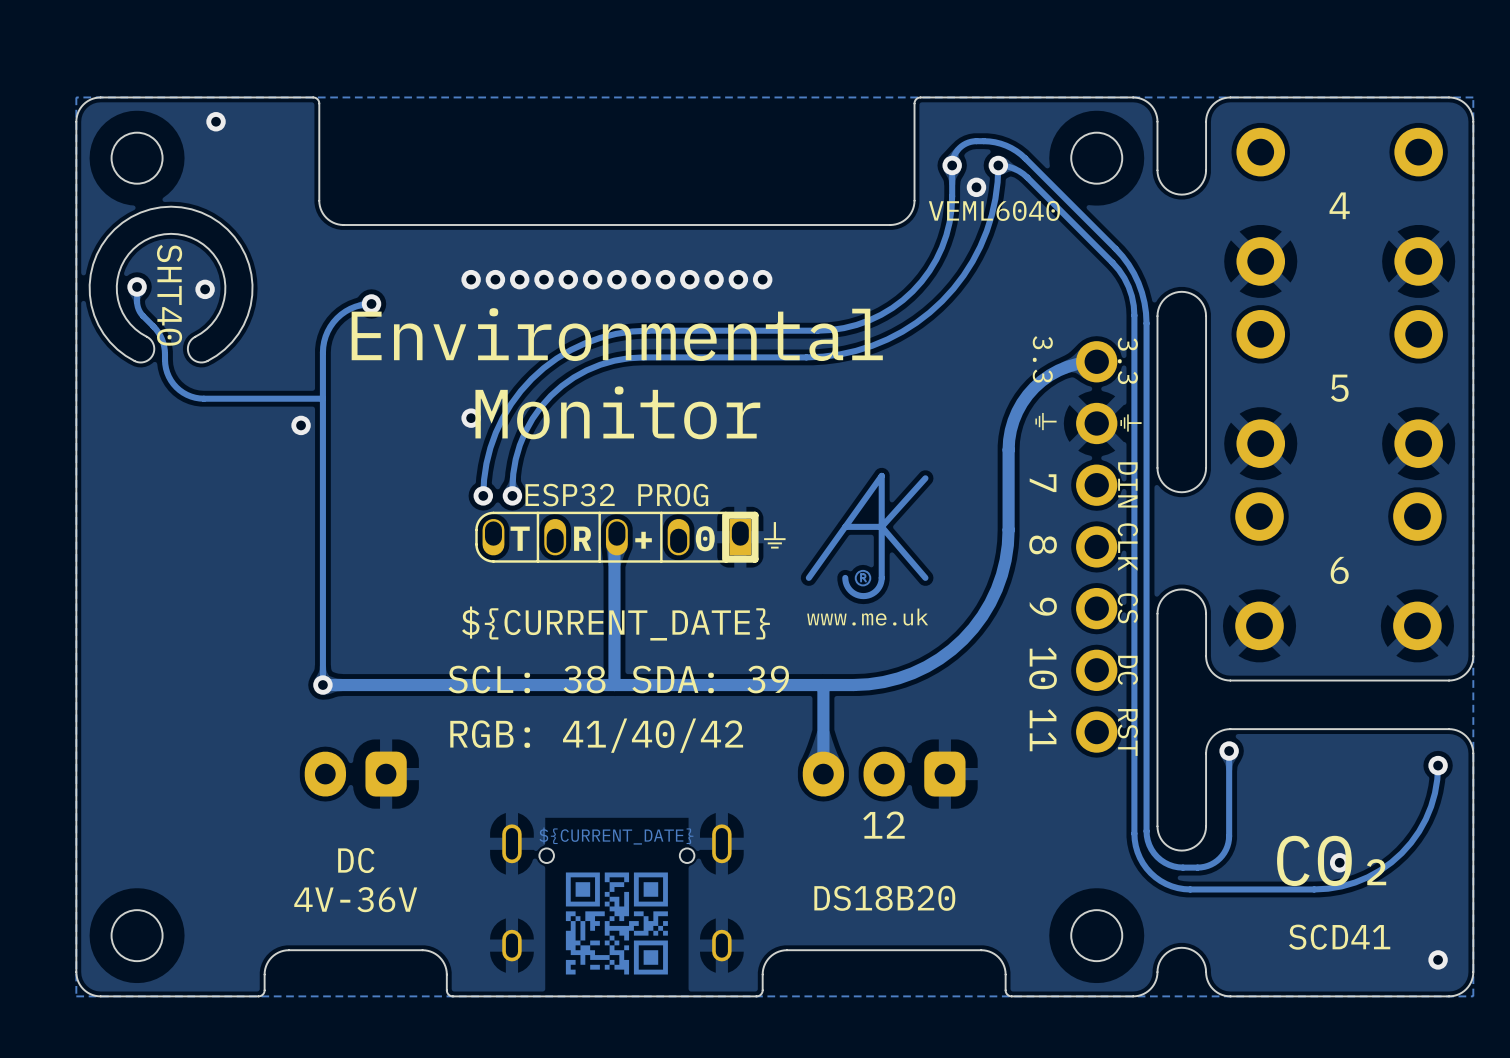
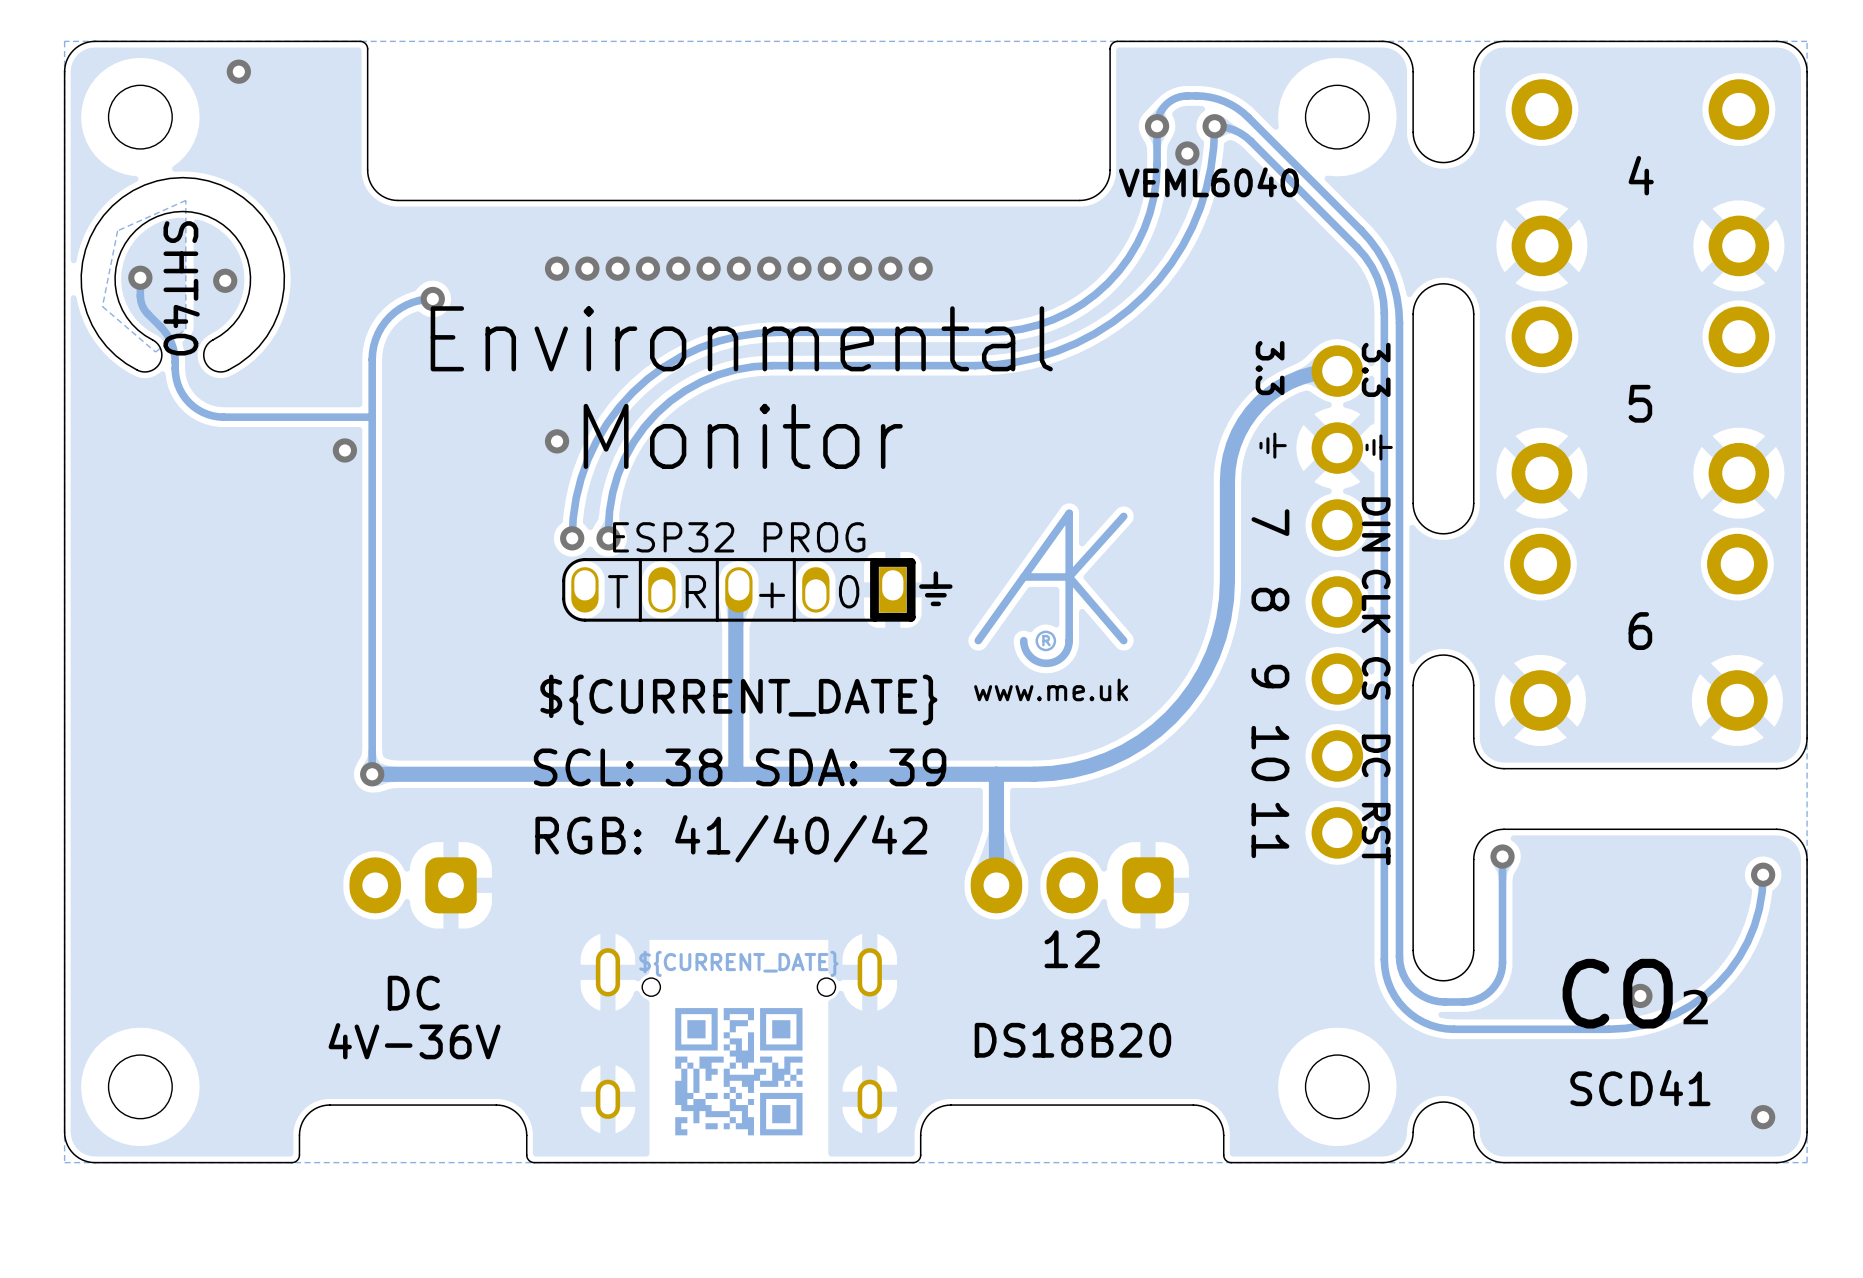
zone outline: none -> (185, 200) (117, 230) (102, 306) (155, 351) (185, 329) (185, 200)

